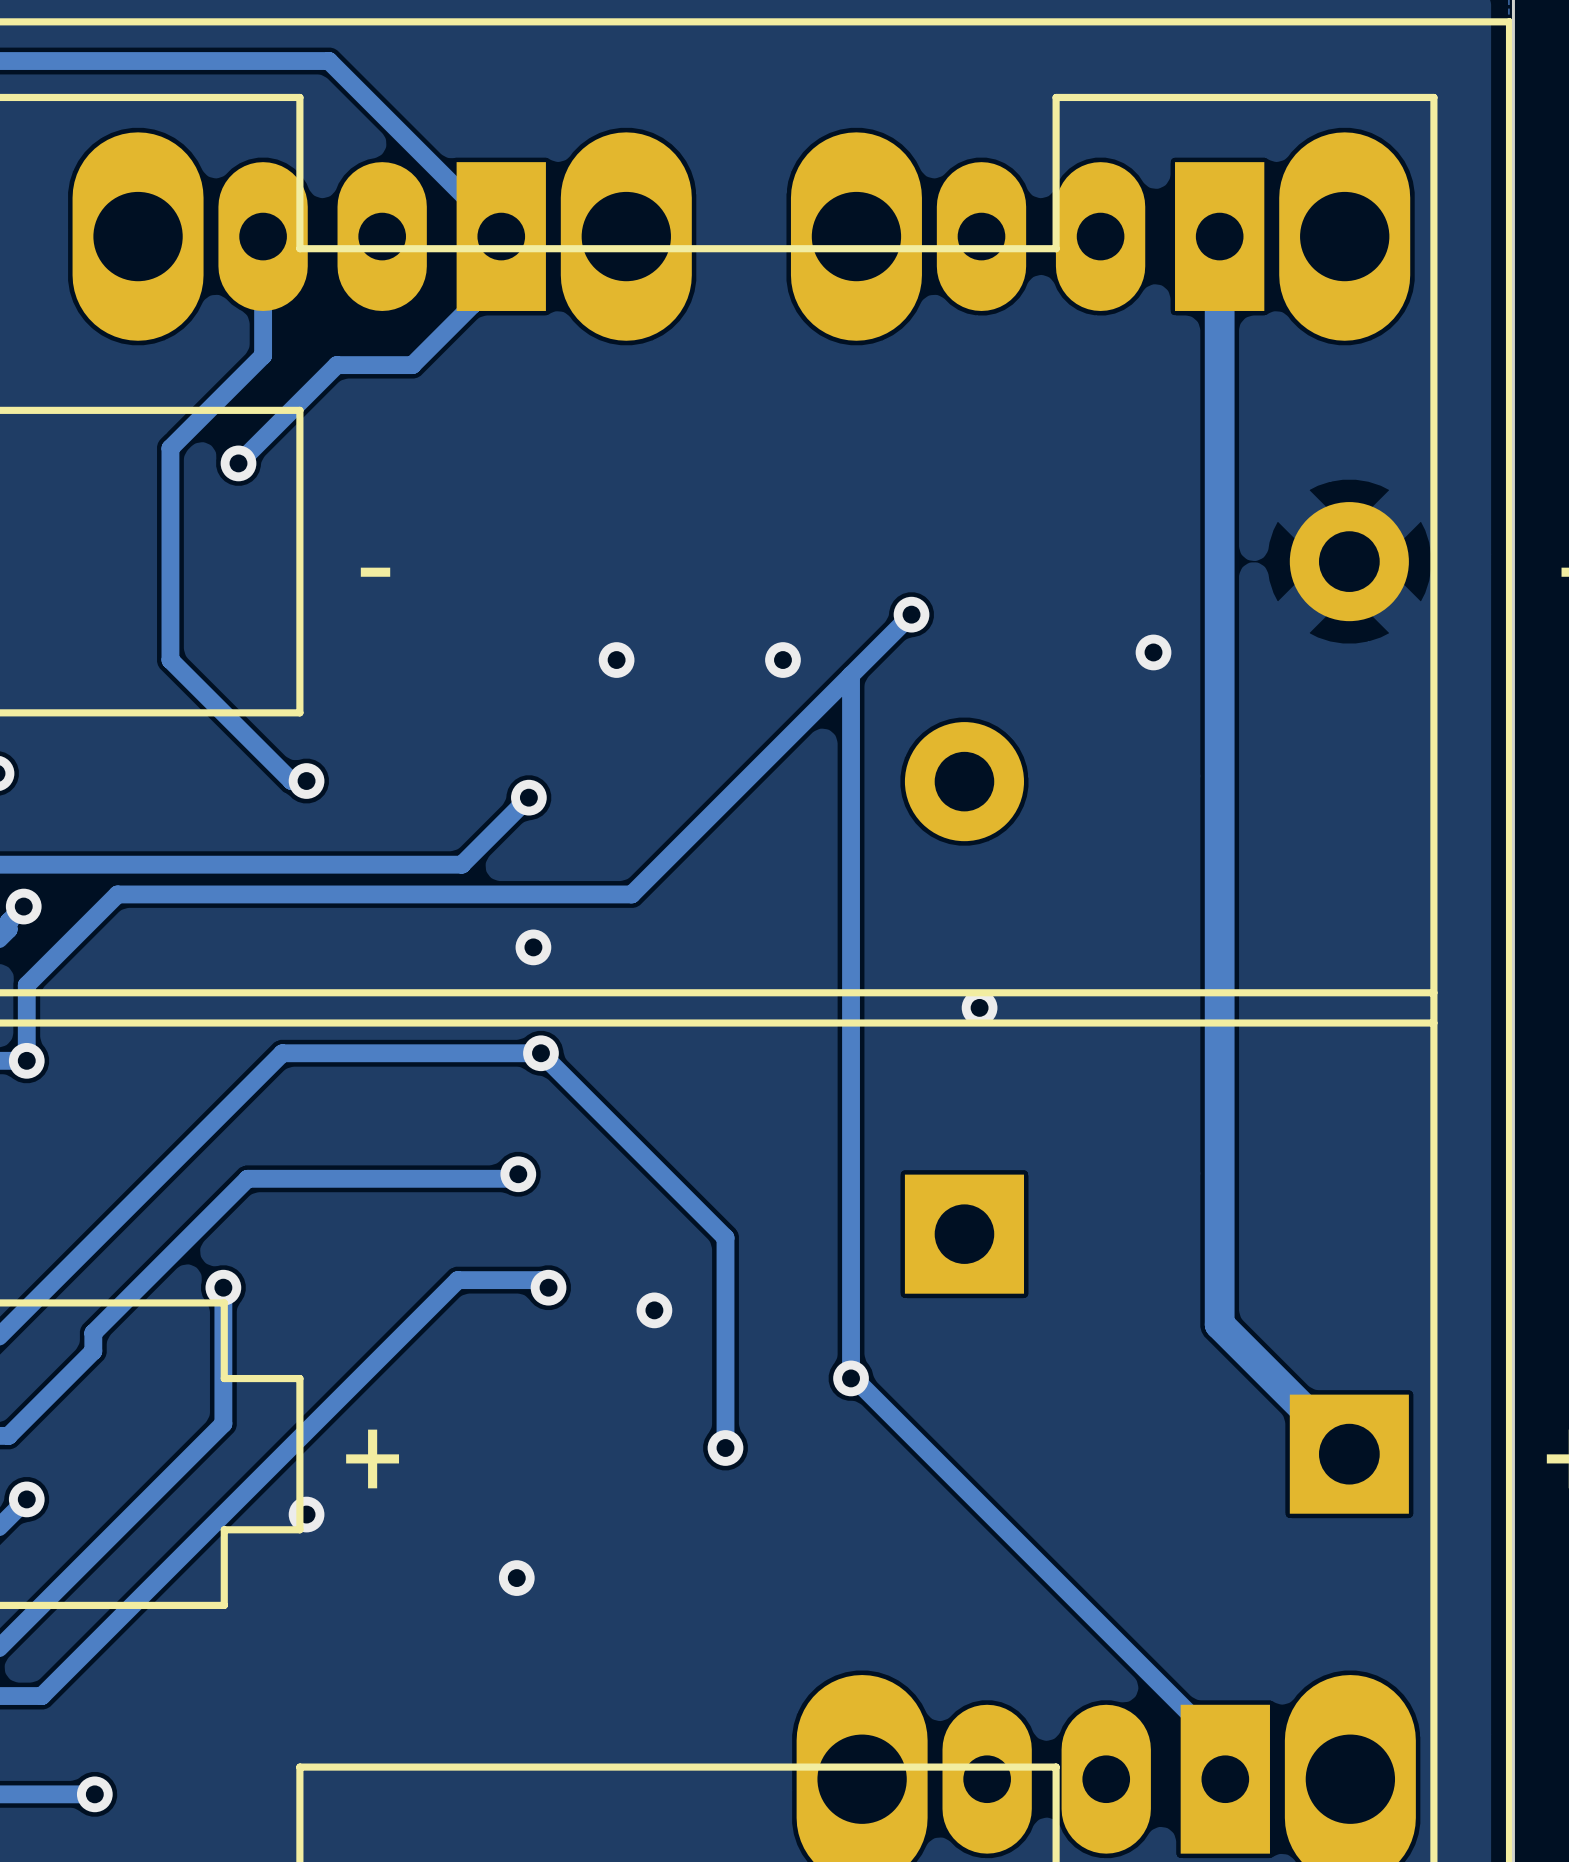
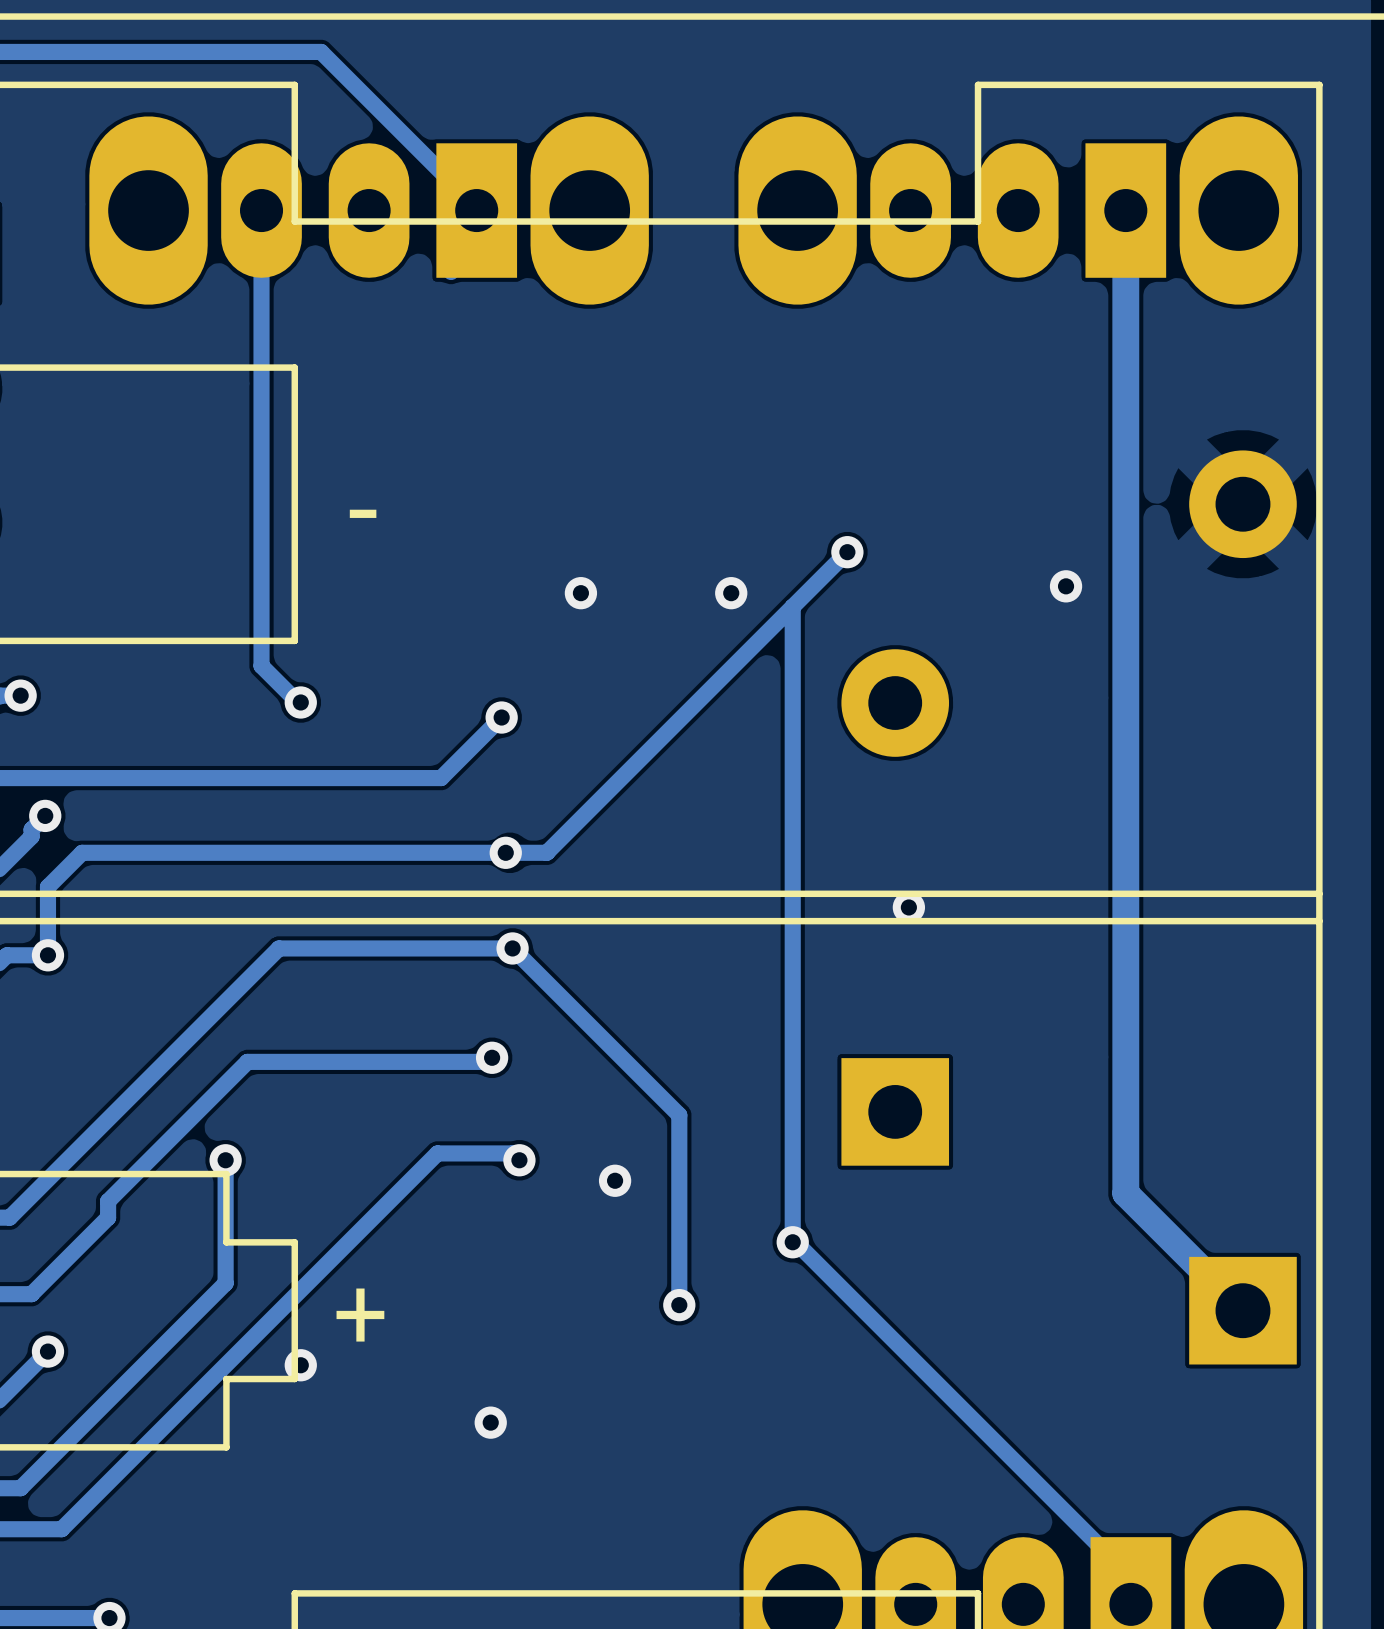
track: (472, 304) (412, 365) (336, 365) (238, 463) -> none
track: (263, 355) (170, 448) (170, 660) (291, 781) (303, 781) -> (261, 318) (261, 665) (298, 702)
via: (238, 463) -> none
track: (631, 894) (117, 894) (64, 947) -> (594, 804) (546, 852) (82, 852)

